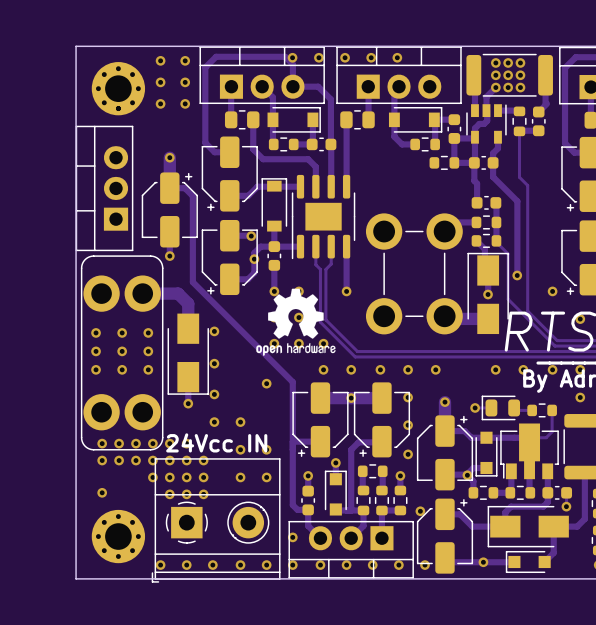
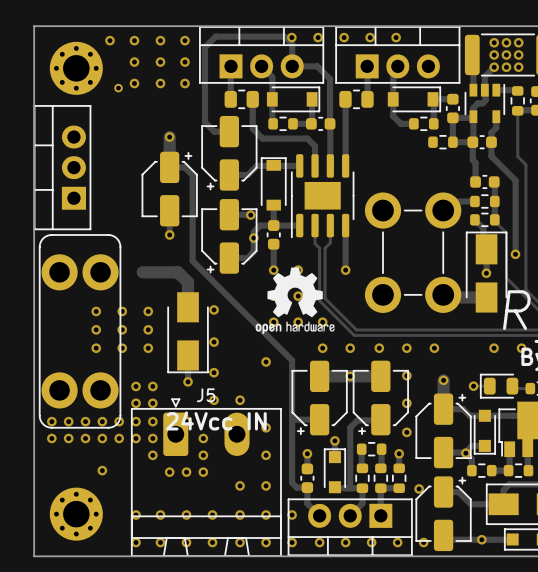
board edge: (76, 46) (76, 578) -> (76, 26) (34, 26) (34, 556) (76, 556)
via: none -> (110, 40)
via: none -> (134, 40)
via: none -> (134, 62)
part position: (118, 88) -> (76, 68)
via: none -> (134, 83)
part position: (104, 188) -> (62, 167)
part position: (122, 352) -> (80, 331)
via: none -> (136, 386)
via: none -> (152, 386)
via: none -> (136, 403)
via: none -> (152, 403)
via: none -> (51, 421)
via: none -> (68, 421)
via: none -> (85, 421)
via: (169, 443) -> none
via: (240, 449) -> none
via: none -> (51, 438)
via: none -> (68, 438)
via: none -> (85, 438)
via: (169, 460) -> none
via: (186, 460) -> none
via: (169, 477) -> none
via: (186, 477) -> none
via: (240, 477) -> none
J5: none -> (206, 477)
via: none -> (240, 485)
via: none -> (266, 485)
part: (216, 520) -> none
part position: (118, 536) -> (76, 514)
via: none -> (136, 514)
via: none -> (160, 514)
via: none -> (186, 514)
via: none -> (212, 514)
via: none -> (240, 514)
via: none -> (266, 514)
via: none -> (136, 542)

